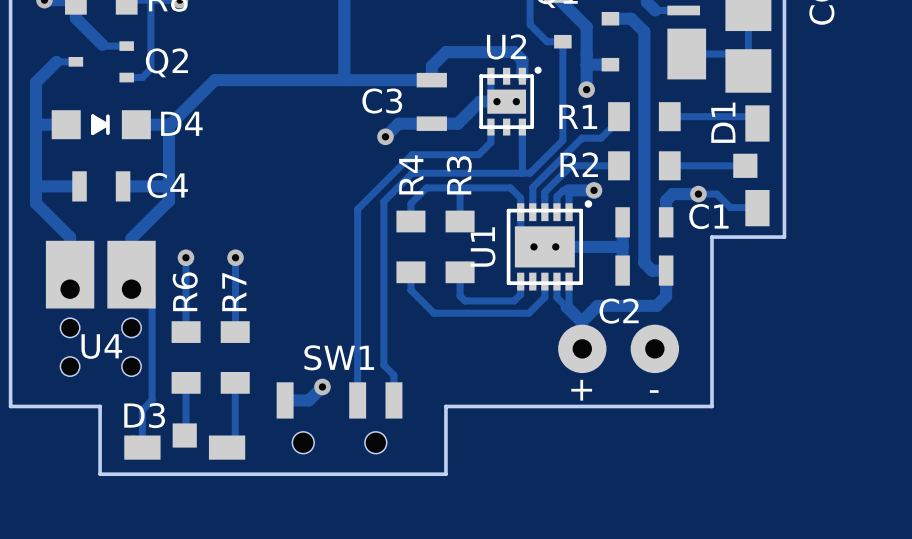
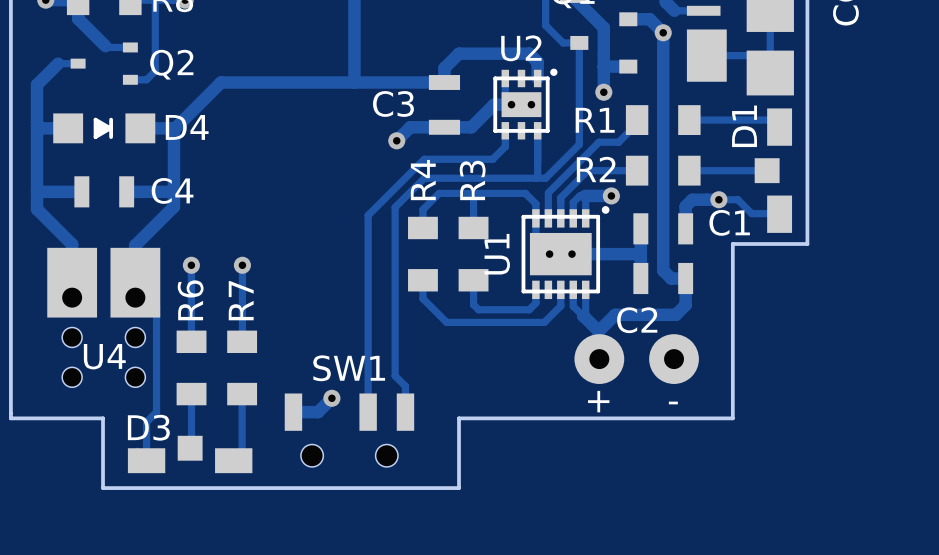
via: none -> (663, 32)

